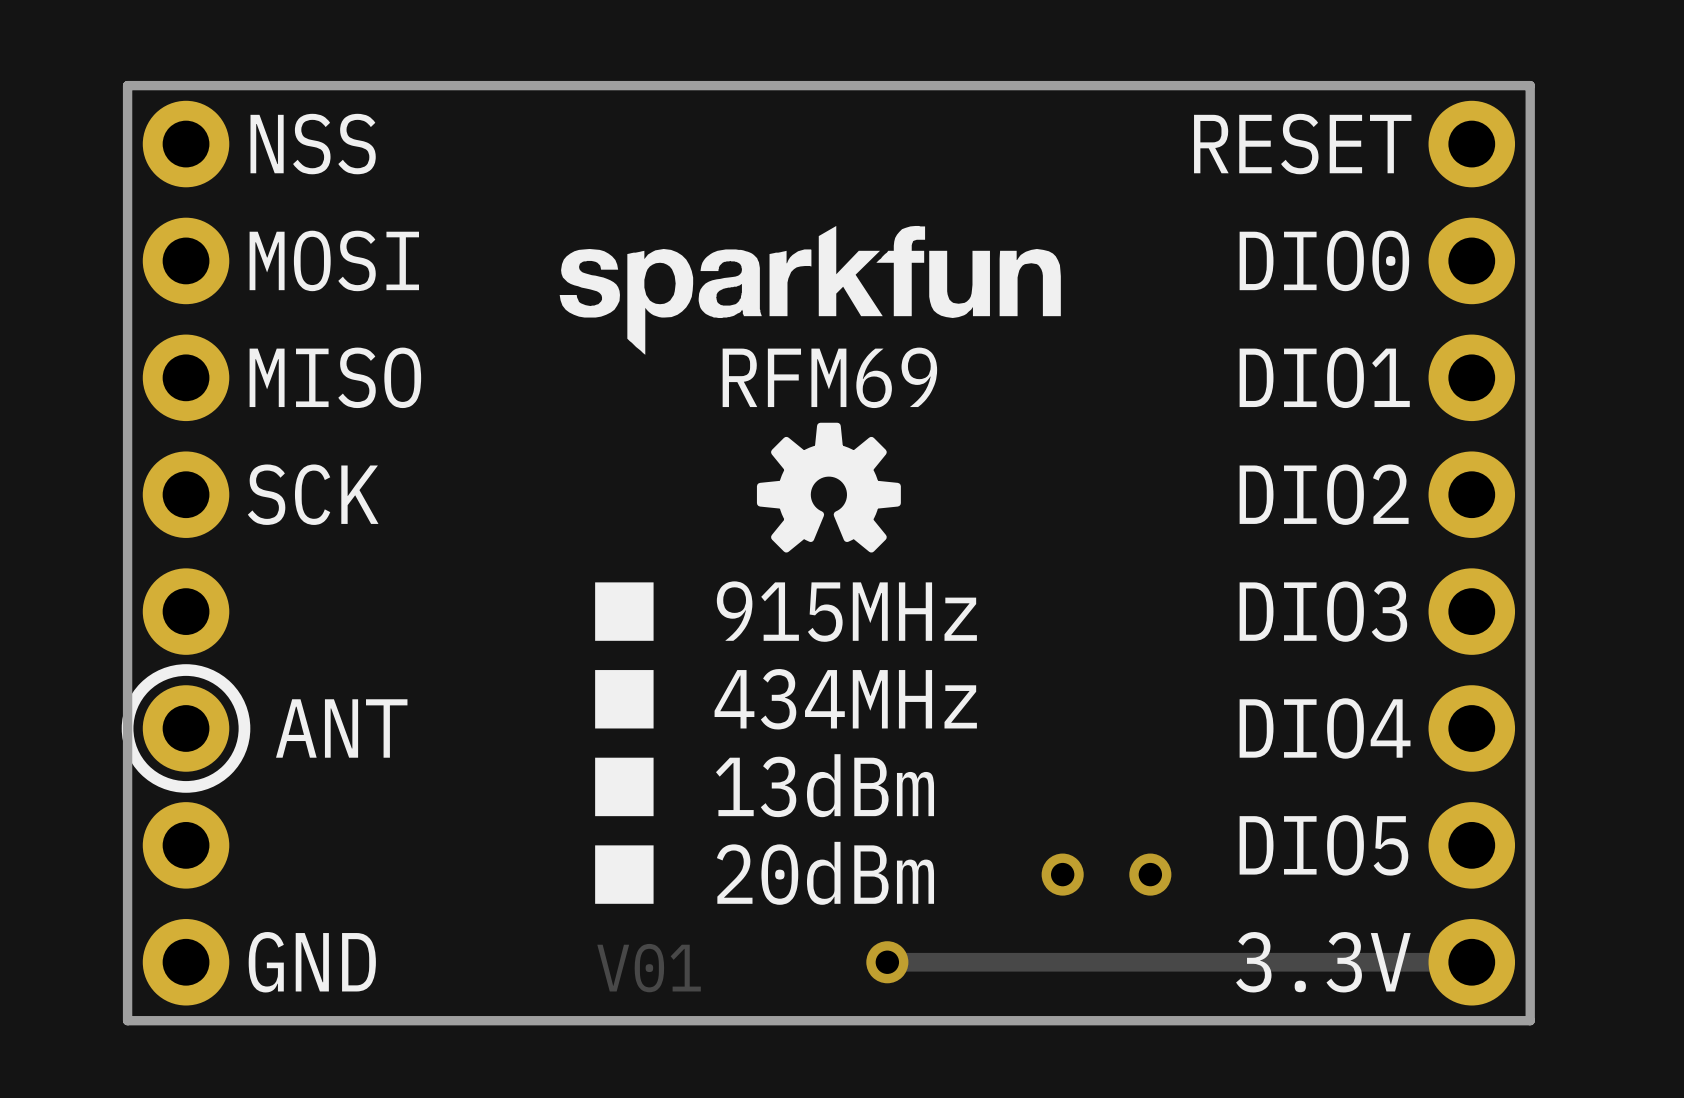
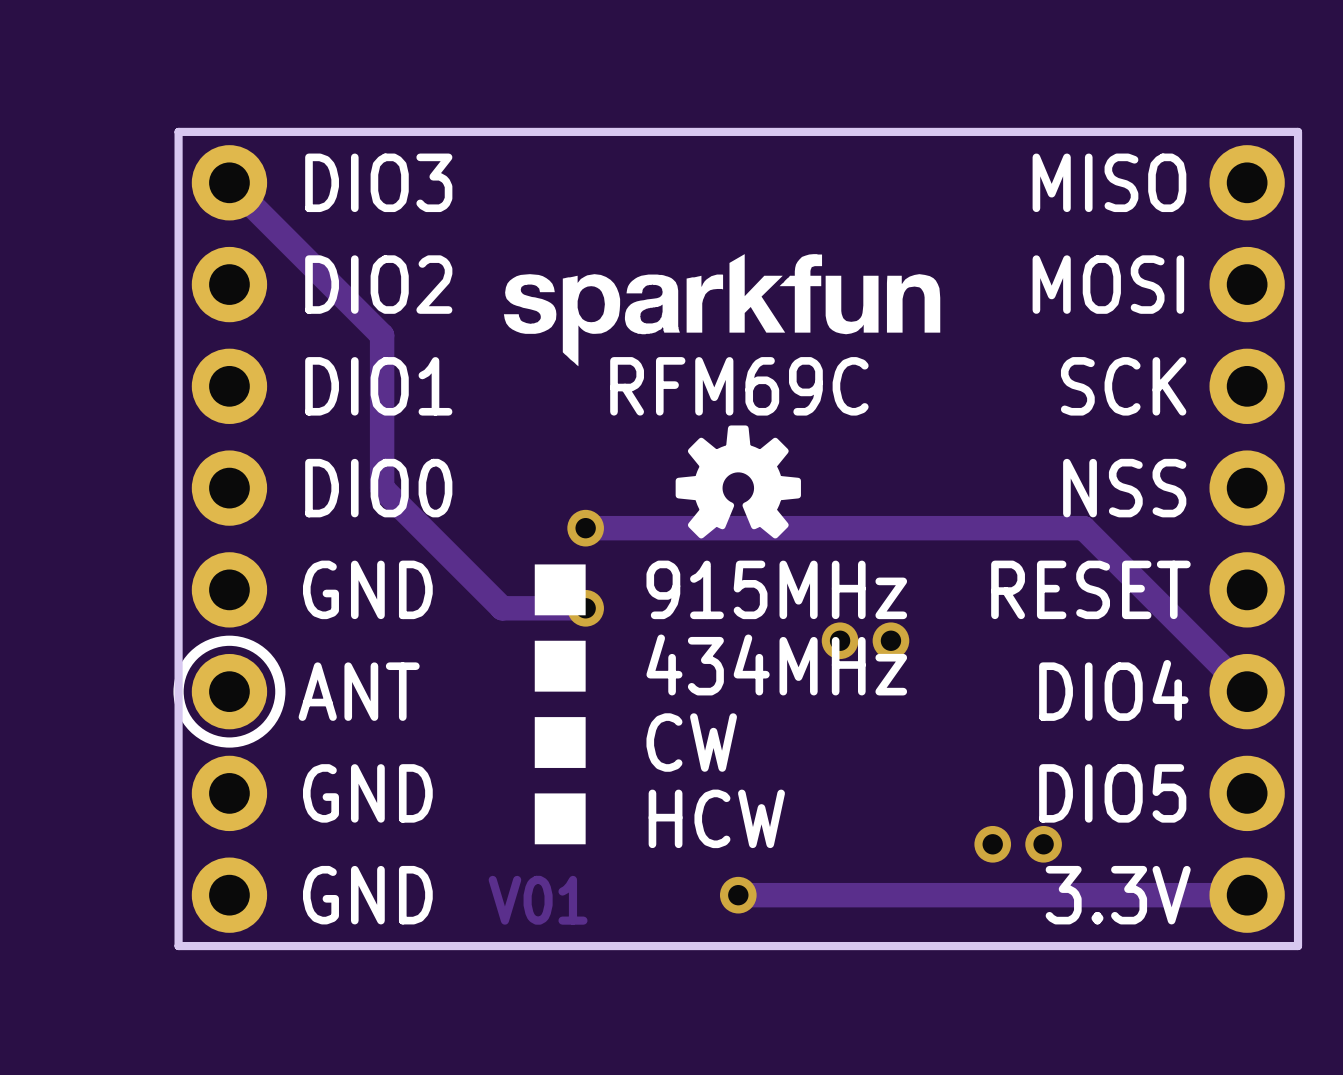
board edge: (244, 85) (127, 85) (127, 1020) (244, 1020) -> (178, 131) (178, 946)
track: none -> (229, 182) (382, 335) (382, 488) (502, 608) (585, 608)
text: NSS (313, 144) -> none
text: none -> DIO3 (378, 182)
text: RESET (1302, 144) -> MISO (1109, 182)
text: MOSI (334, 260) -> none
text: none -> DIO2 (378, 284)
text: DIO0 (1324, 260) -> MOSI (1108, 284)
drawing position: (810, 290) -> (722, 310)
part position: (186, 319) -> (229, 335)
text: MISO (335, 377) -> none
text: none -> DIO1 (378, 386)
text: RFM69 (829, 377) -> RFM69C (739, 386)
text: DIO1 (1324, 377) -> SCK (1123, 386)
drawing position: (828, 487) -> (738, 481)
text: SCK (313, 494) -> none
text: none -> DIO0 (378, 488)
text: DIO2 (1324, 494) -> NSS (1124, 488)
track: none -> (585, 528) (1083, 528) (1247, 691)
via: none -> (585, 528)
part: (1471, 553) -> none
drawing: [595, 582, 654, 904] -> none
drawing: none -> [534, 564, 586, 845]
text: none -> GND (367, 589)
text position: 915MHz (846, 611) -> 915MHz (776, 589)
text: DIO3 (1323, 611) -> RESET (1090, 589)
via: none -> (585, 608)
via: none -> (840, 640)
via: none -> (890, 640)
text position: 434MHz (845, 699) -> 434MHz (776, 664)
drawing position: (186, 728) -> (229, 691)
part position: (186, 728) -> (229, 691)
text position: ANT (341, 728) -> ANT (359, 691)
text: 13dBm (825, 785) -> none
text: none -> CW (691, 742)
part: none -> (1247, 742)
text: none -> GND (367, 793)
text: 20dBm (825, 873) -> none
text: none -> HCW (716, 818)
via: (1062, 874) -> none
via position: (1150, 874) -> (992, 844)
via: none -> (1043, 844)
part position: (186, 962) -> (229, 895)
text: GND (312, 962) -> none
text: none -> GND (367, 895)
track width: thin (1471, 962) (887, 962) -> thick (1247, 895) (738, 895)

